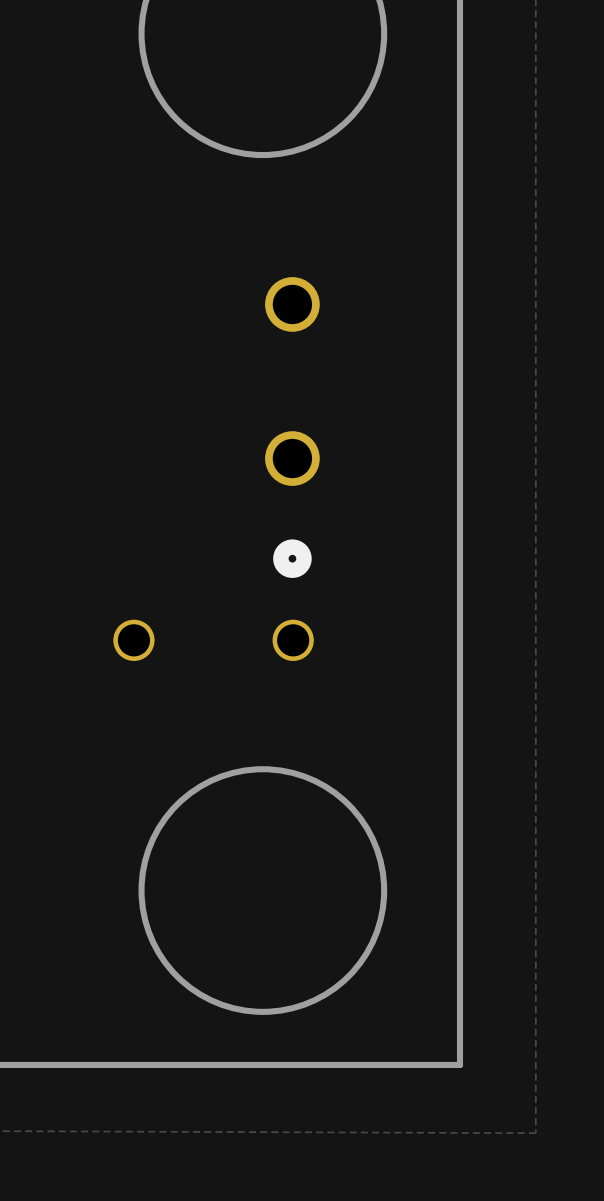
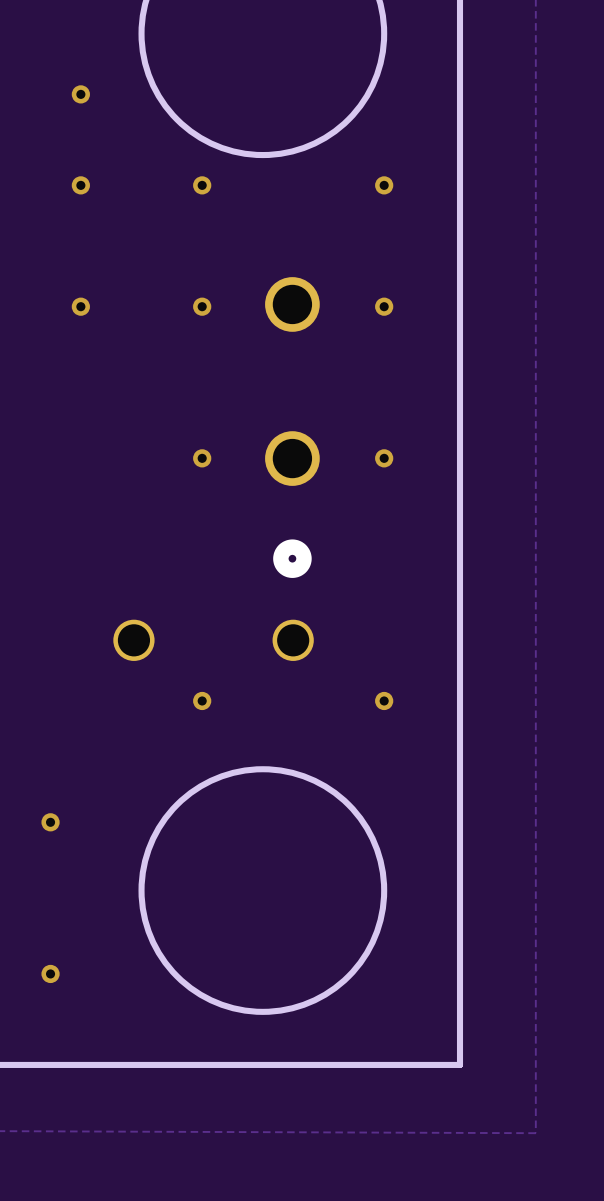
via: none -> (80, 94)
via: none -> (80, 185)
via: none -> (202, 185)
via: none -> (384, 185)
via: none -> (80, 306)
via: none -> (202, 306)
via: none -> (384, 306)
via: none -> (202, 458)
via: none -> (384, 458)
via: none -> (202, 700)
via: none -> (384, 700)
via: none -> (50, 822)
via: none -> (50, 973)

